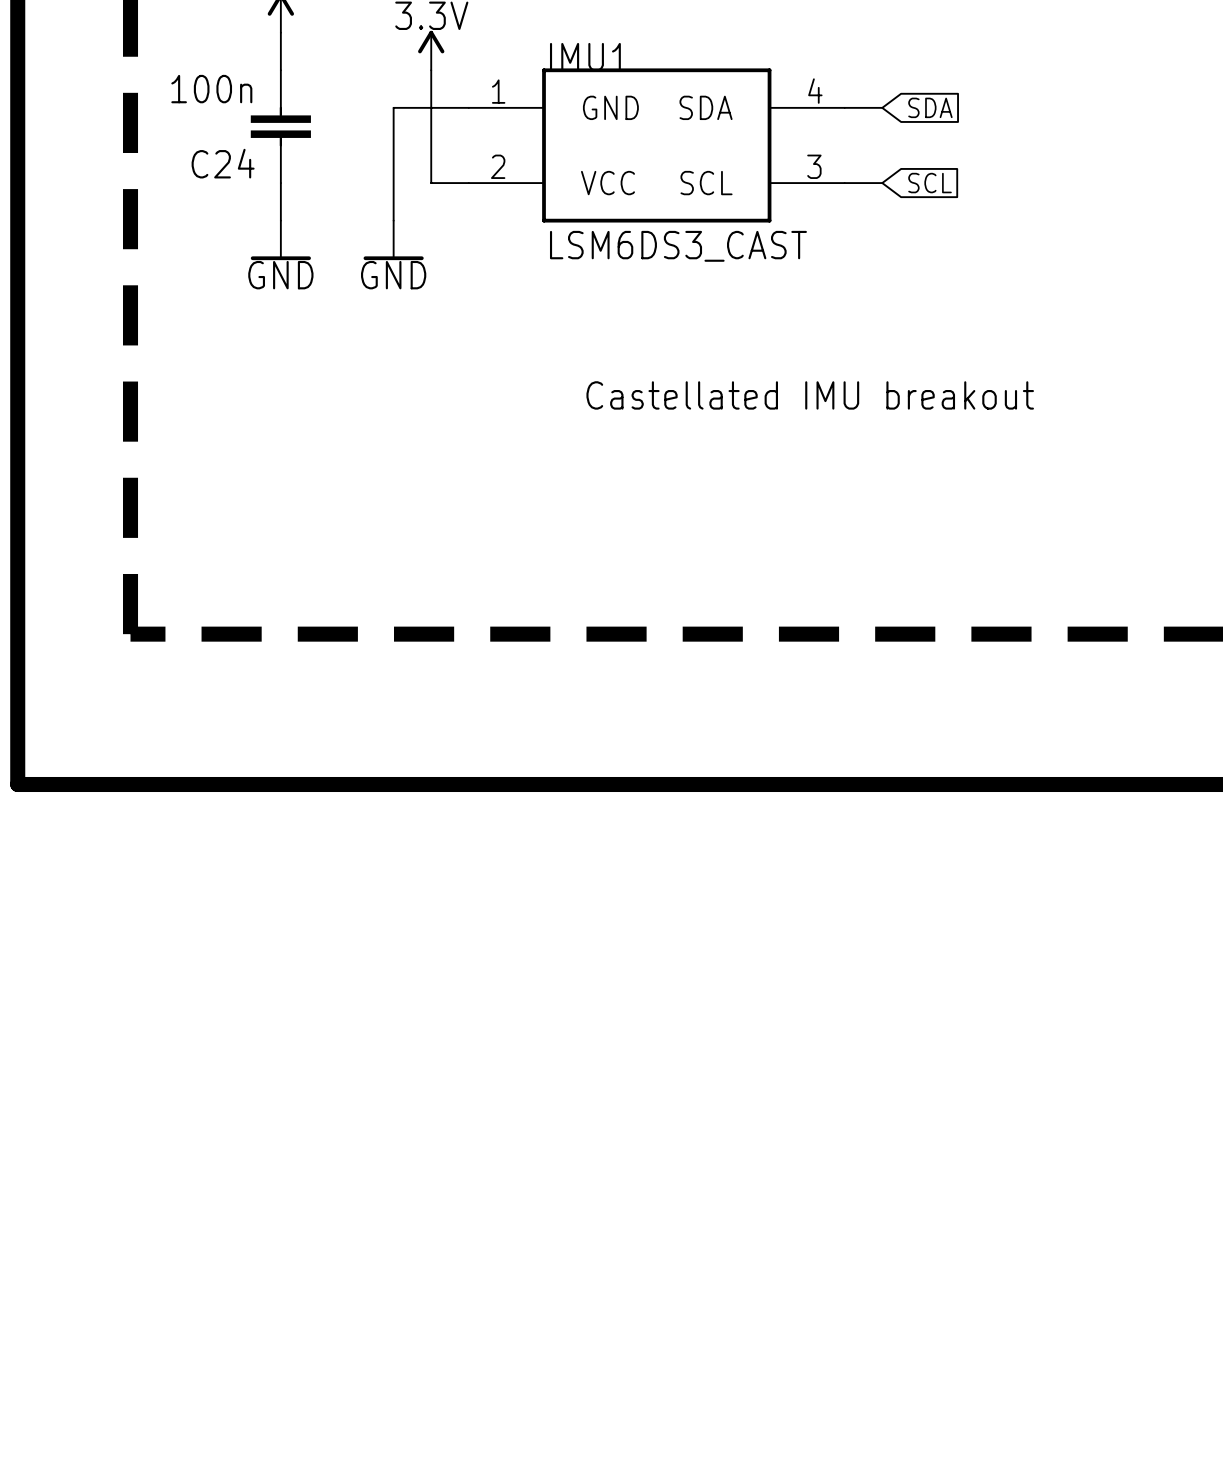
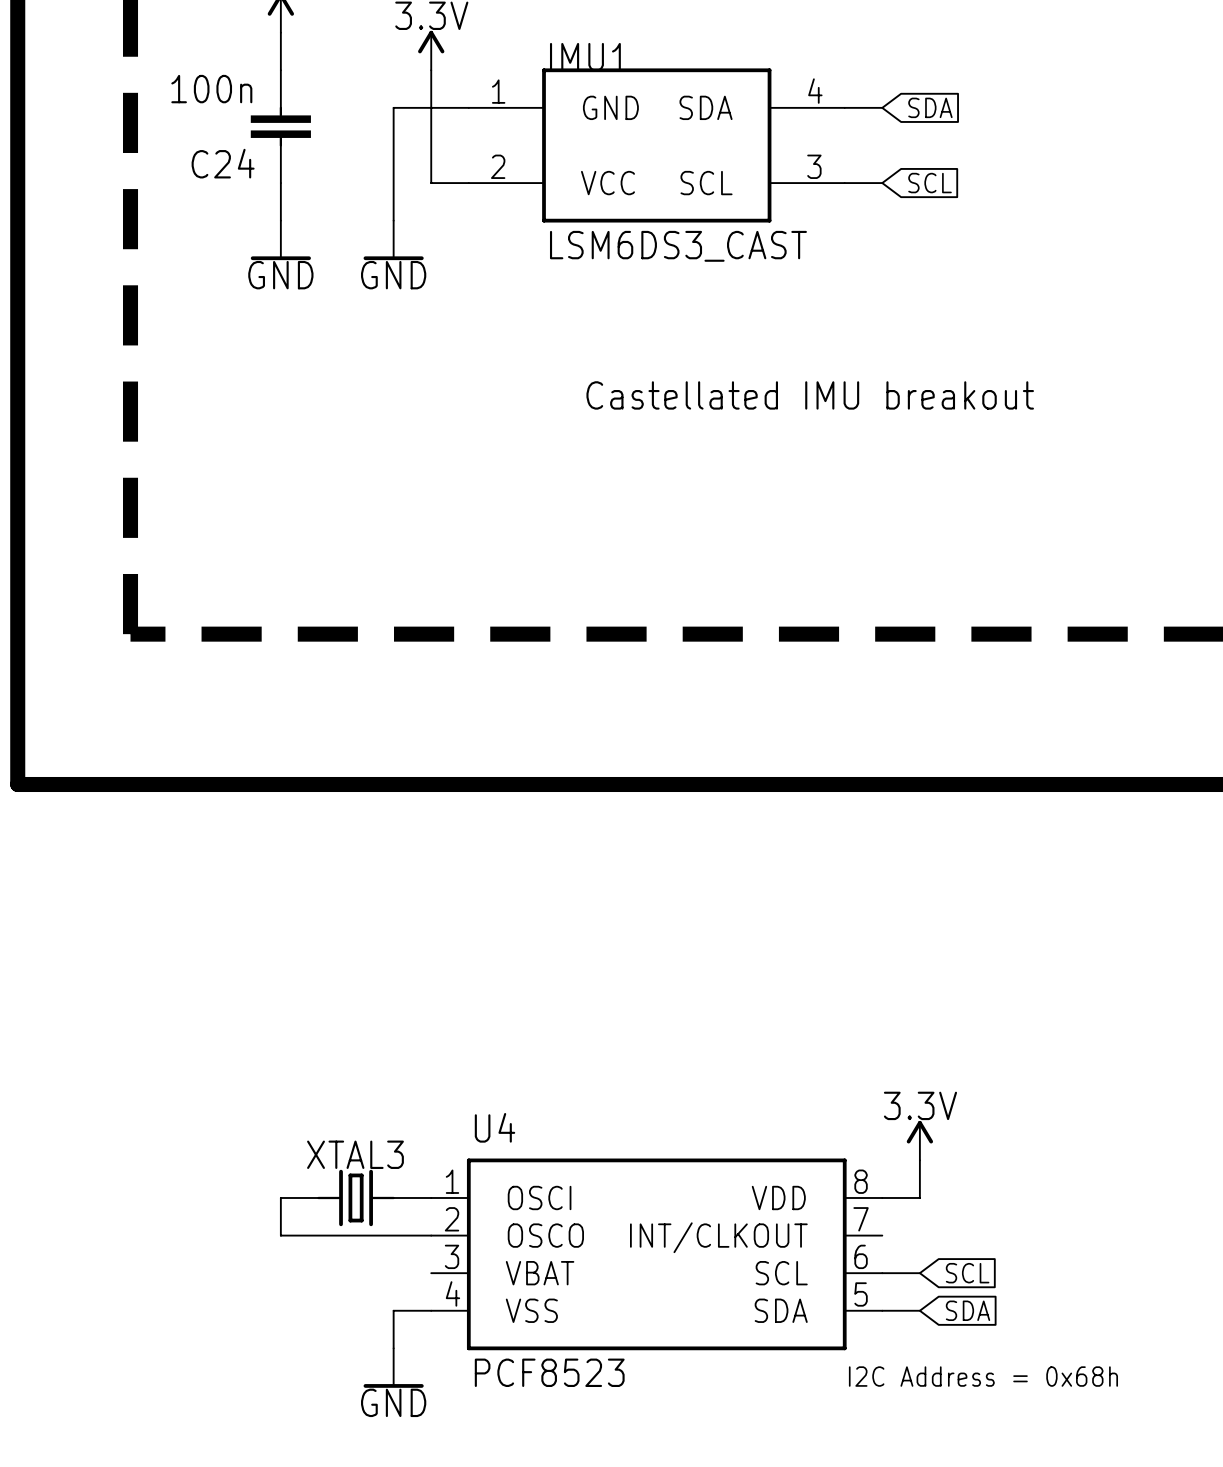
power symbol: none -> 3.3V (919, 1140)
wire: none -> (919, 1160) (919, 1197) (882, 1197)
wire: none -> (318, 1197) (280, 1197) (280, 1235) (431, 1235)
XTAL3: none -> (356, 1197)
wire: none -> (393, 1197) (431, 1197)
U4: none -> PCF8523 (656, 1254)
wire: none -> (882, 1273) (919, 1273)
global label: none -> SCL (967, 1273)
wire: none -> (431, 1310) (393, 1310) (393, 1348)
wire: none -> (882, 1310) (919, 1310)
global label: none -> SDA (968, 1310)
power symbol: none -> GND (393, 1368)
text: none -> I2C Address = 0x68h (983, 1376)

